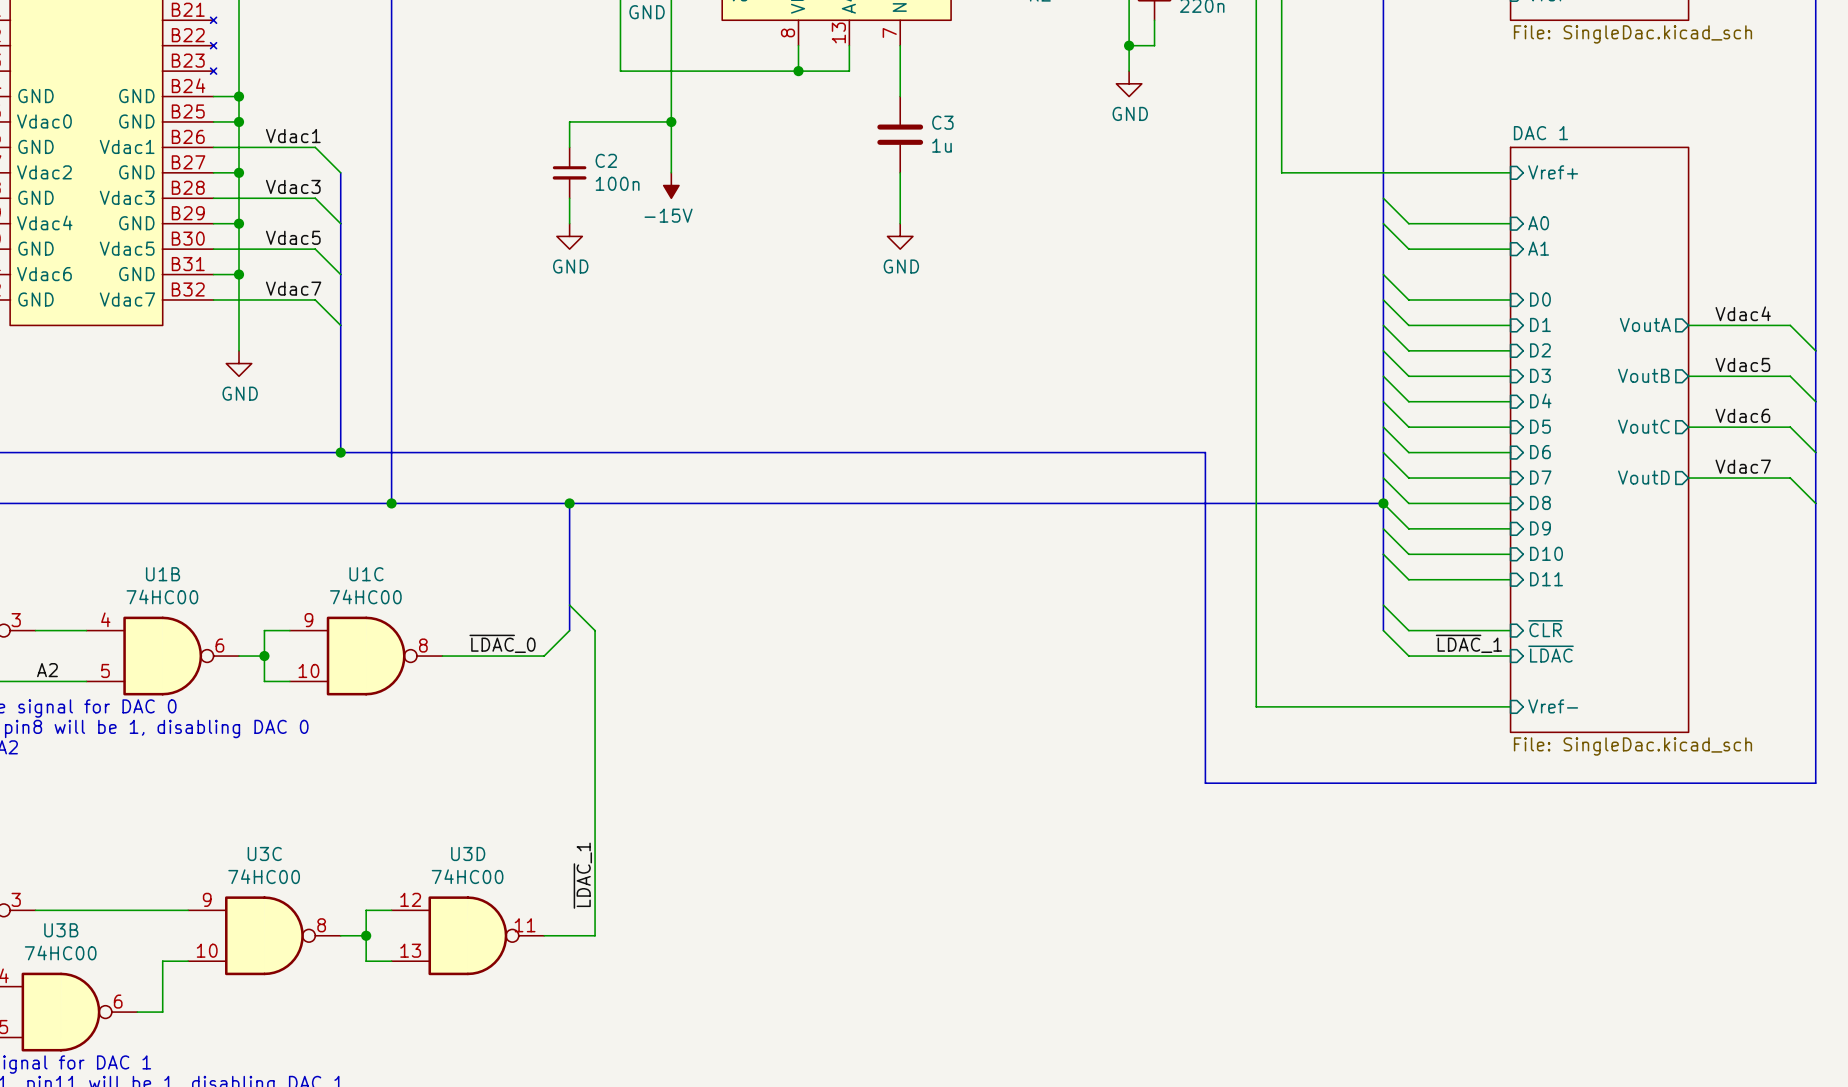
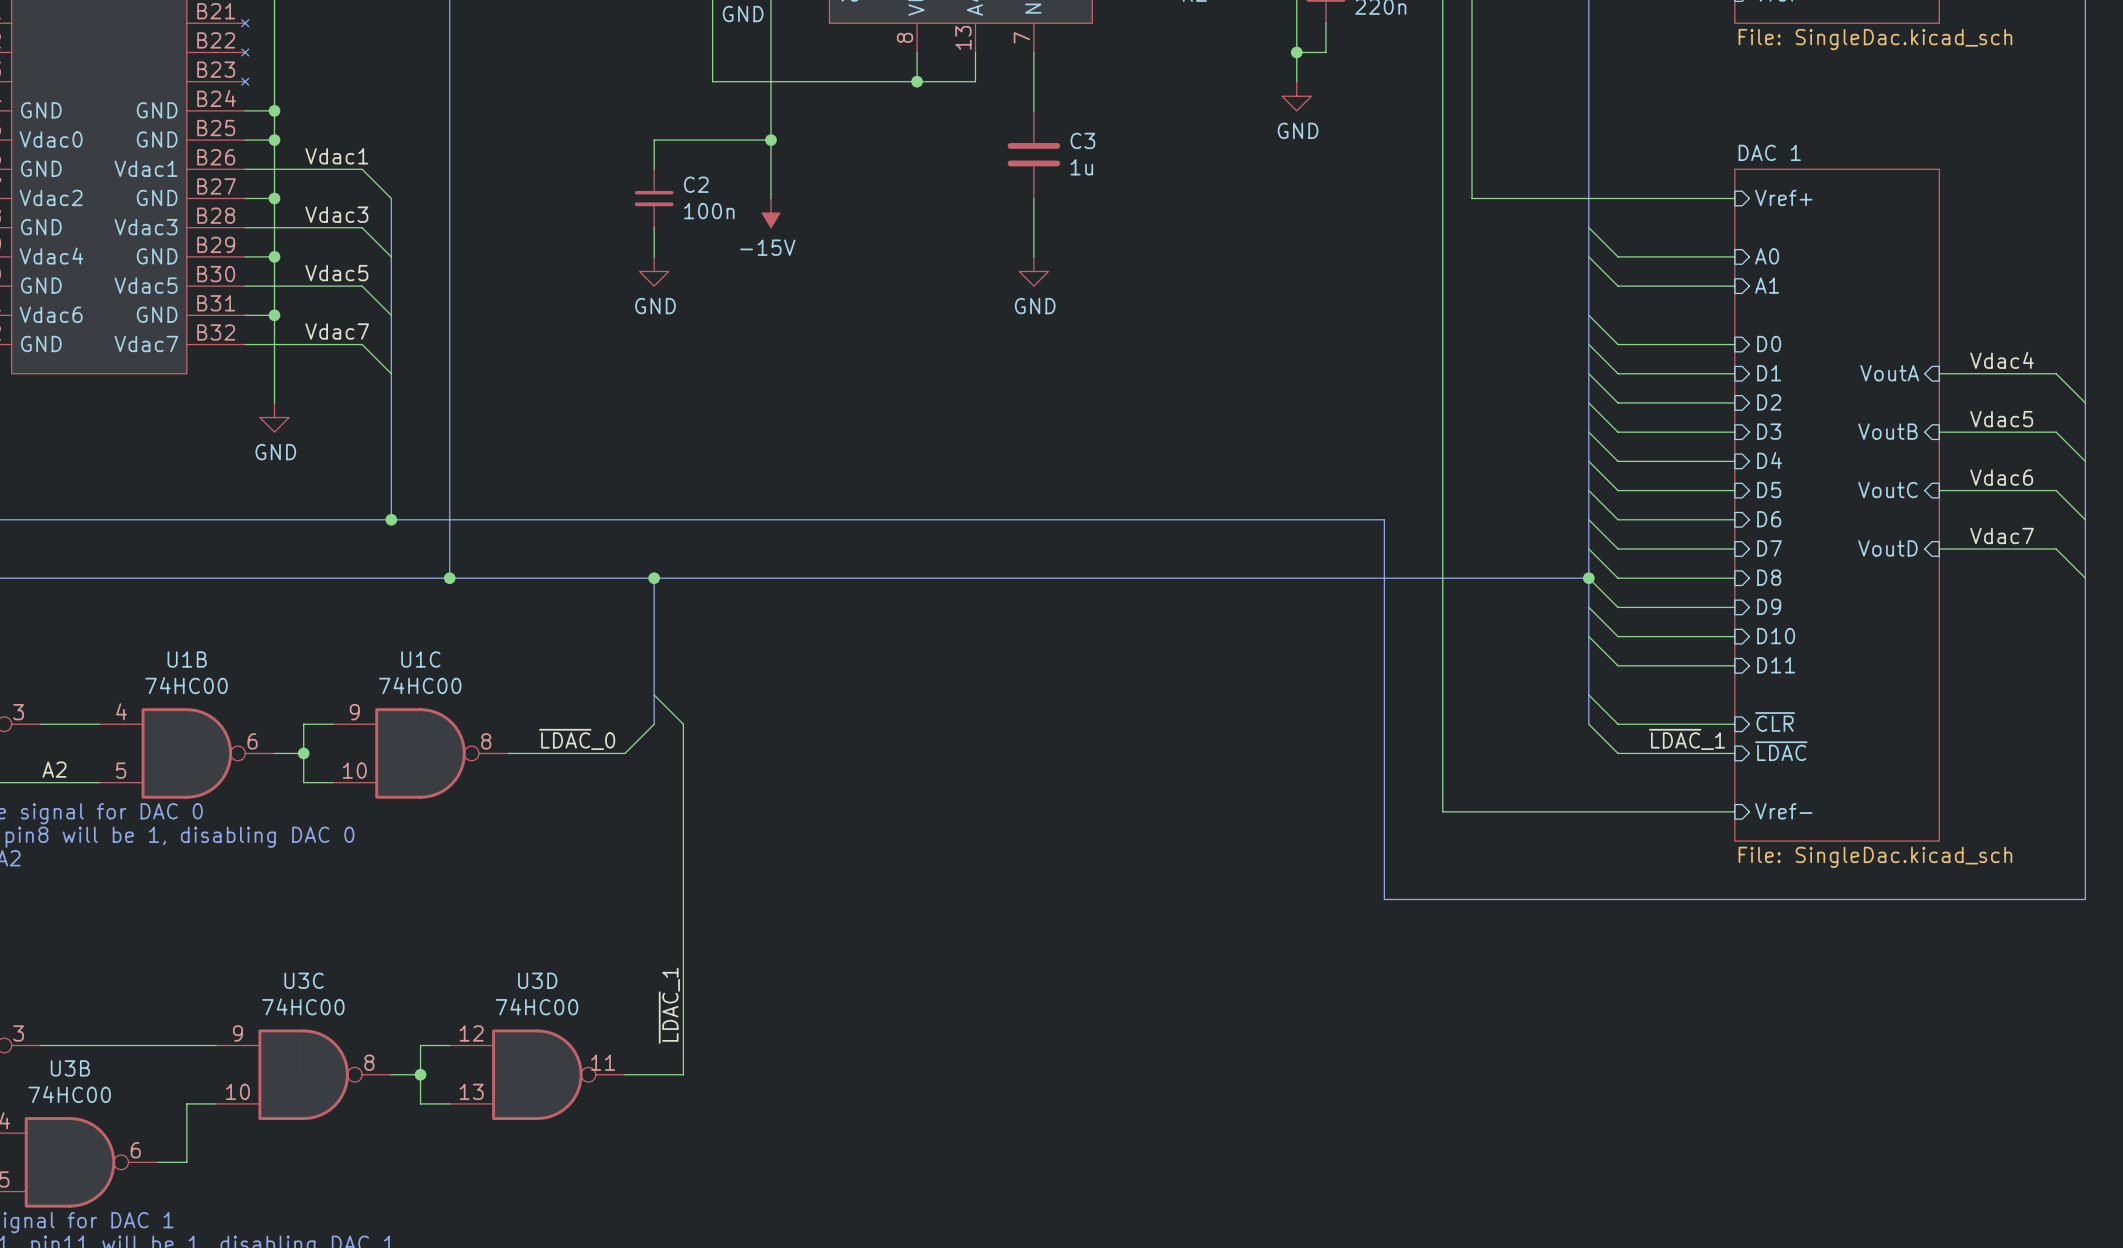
sheet pin shape: output (1645, 324) -> input (1889, 373)
sheet pin shape: output (1643, 375) -> input (1887, 431)
sheet pin shape: output (1643, 426) -> input (1887, 490)
sheet pin shape: output (1643, 477) -> input (1887, 548)

